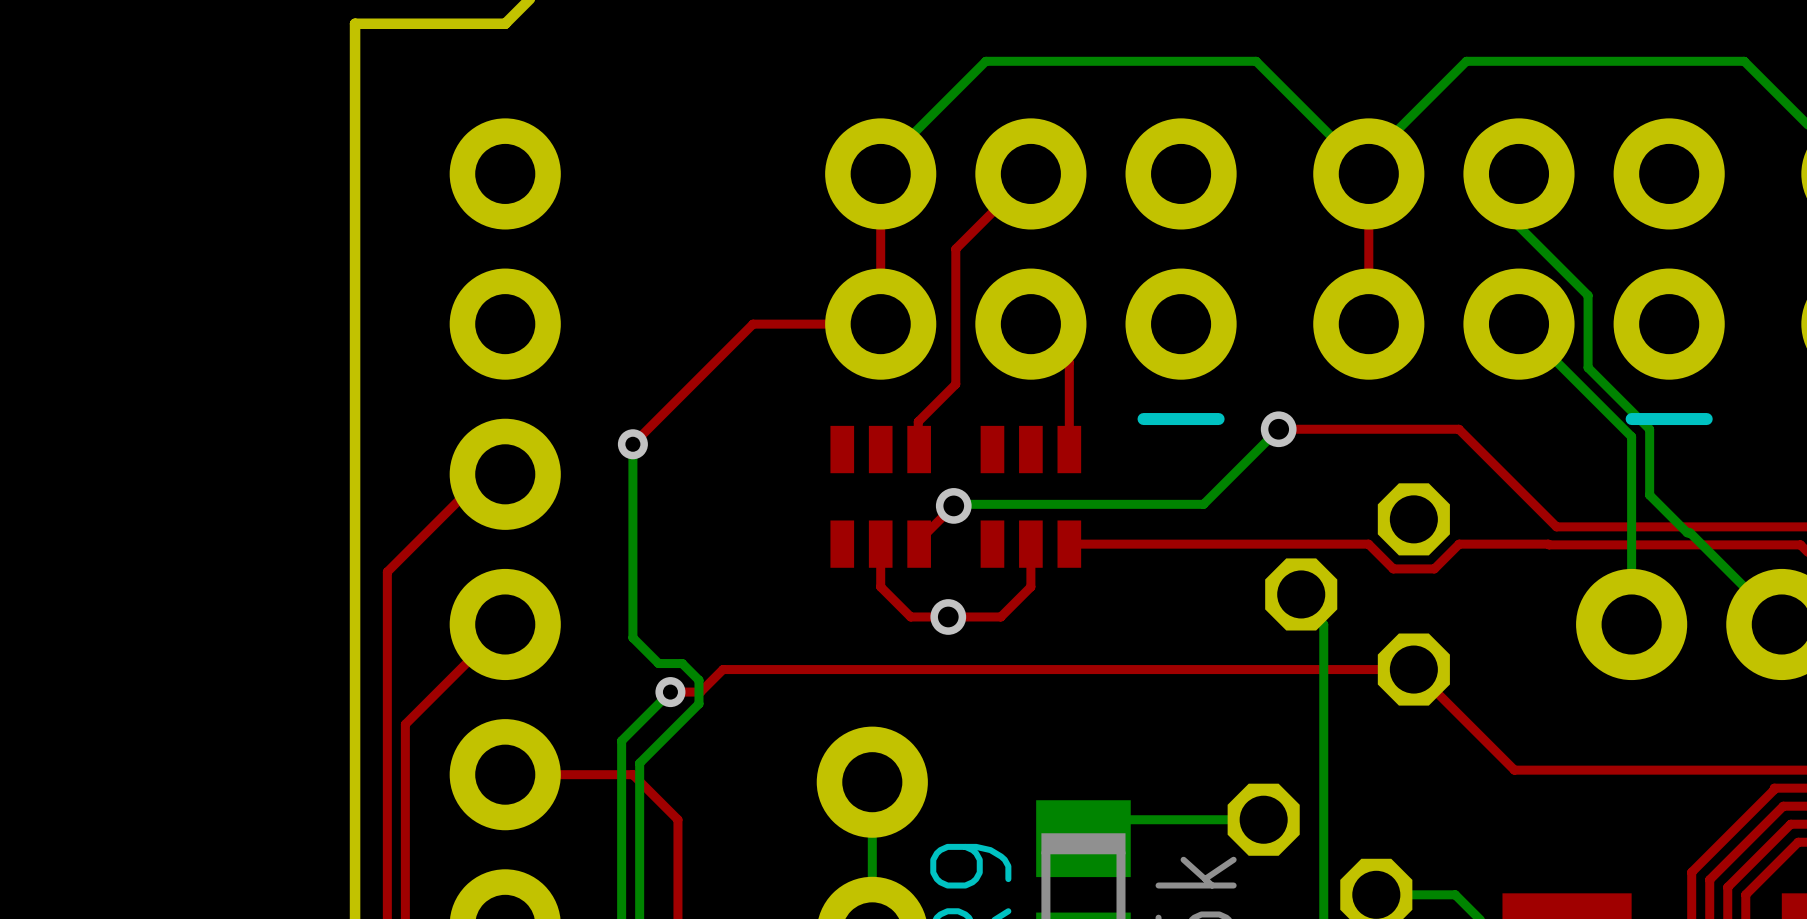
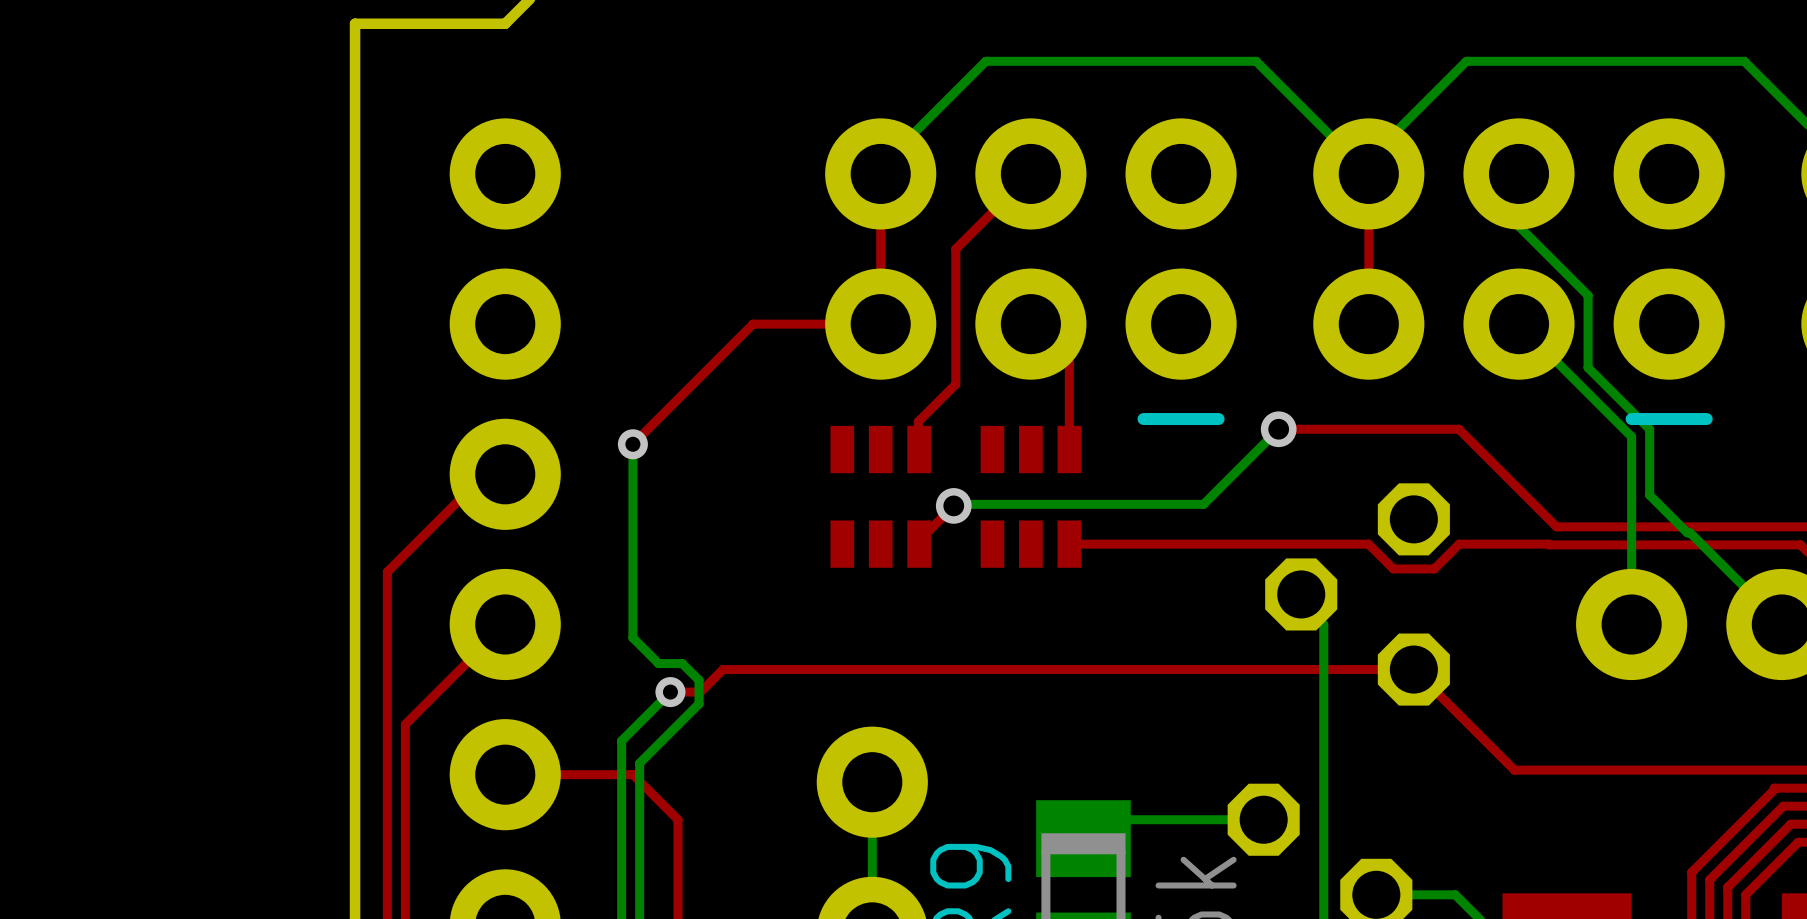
top track: (1030, 544) (1030, 586) (1000, 616) (910, 616) (880, 586) (880, 544) -> none
via: (948, 616) -> none

